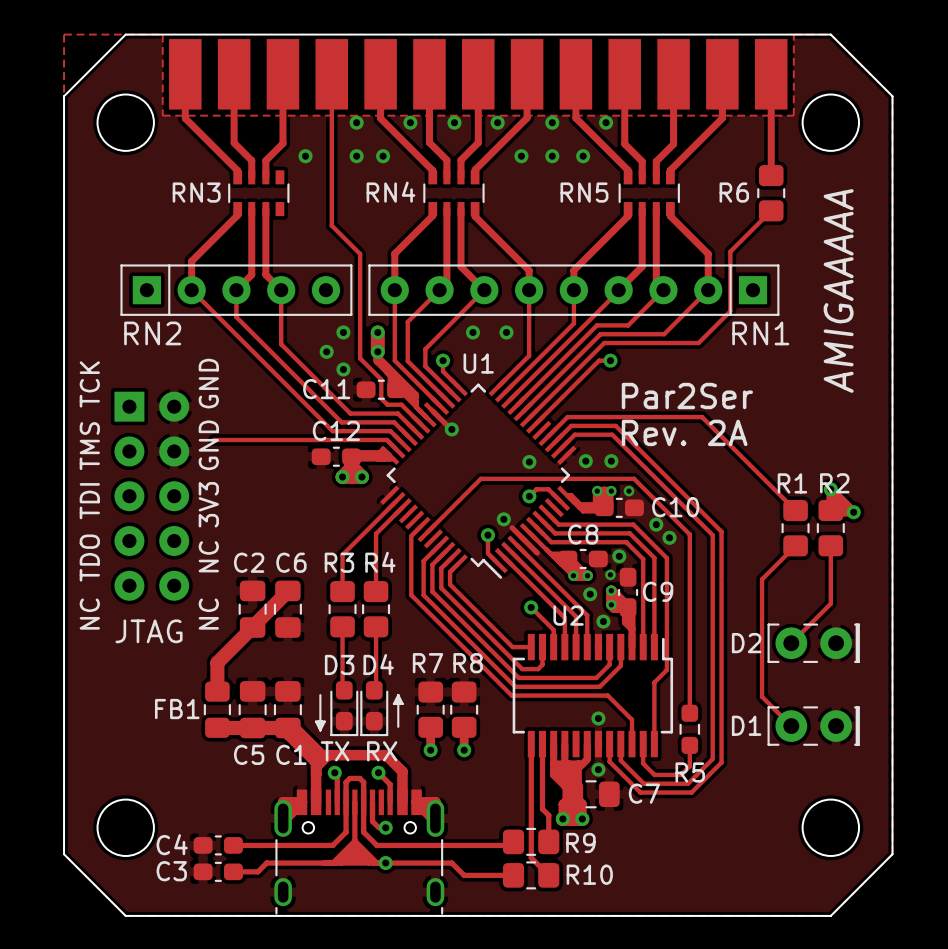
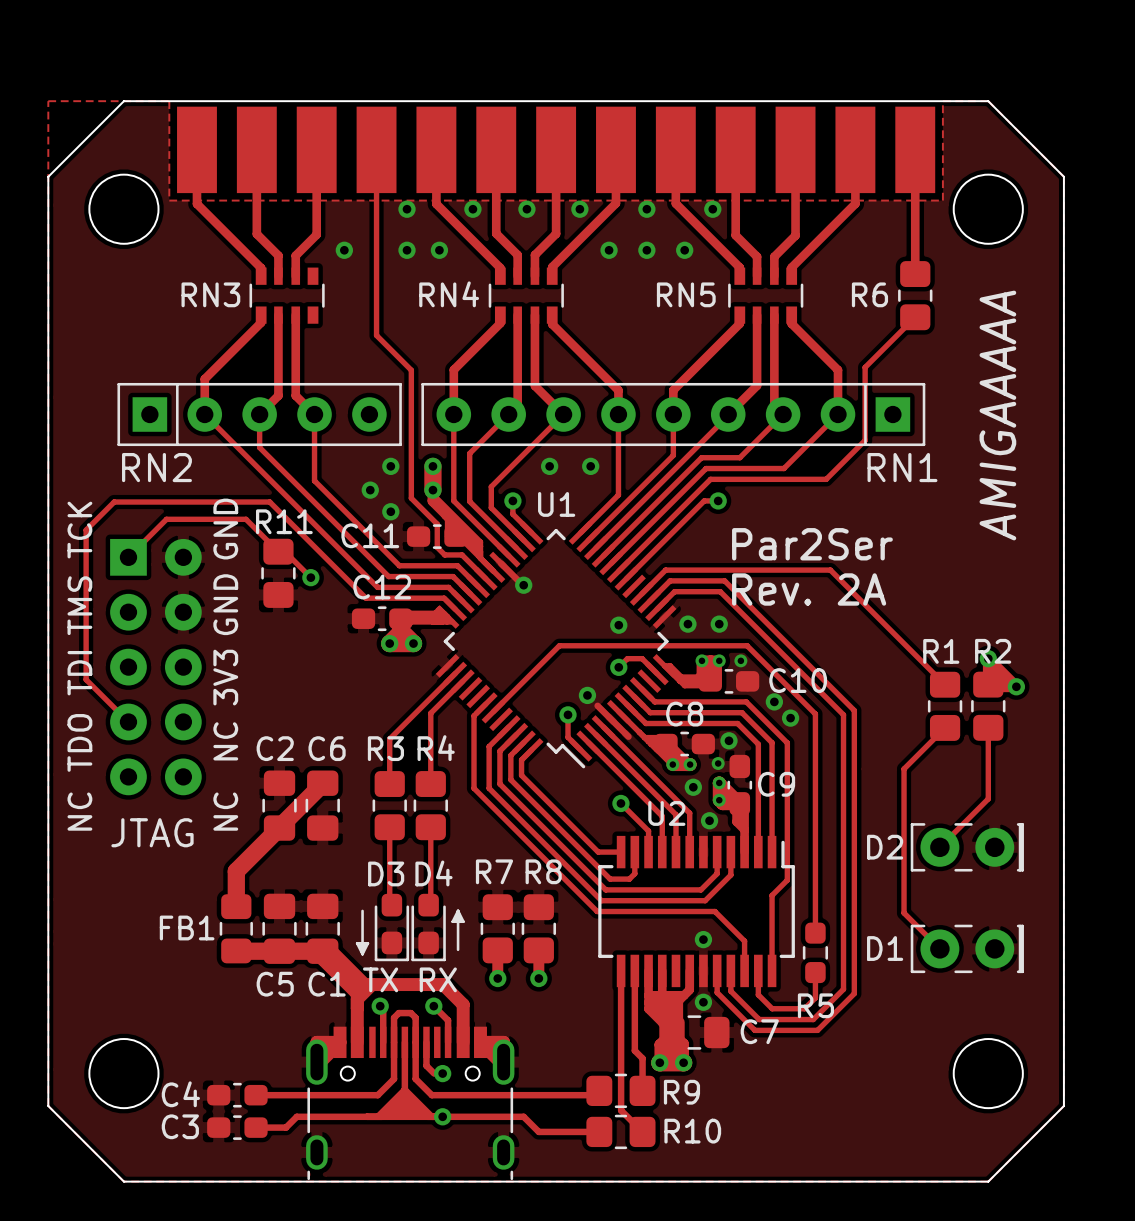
track: none -> (128, 557) (166, 519) (246, 519) (278, 551) (284, 551) (310, 577)
R11: none -> (278, 573)
via: none -> (310, 577)
track: (213, 439) (323, 439) -> (128, 722) (86, 679) (86, 530) (114, 502) (269, 502) (365, 598)

